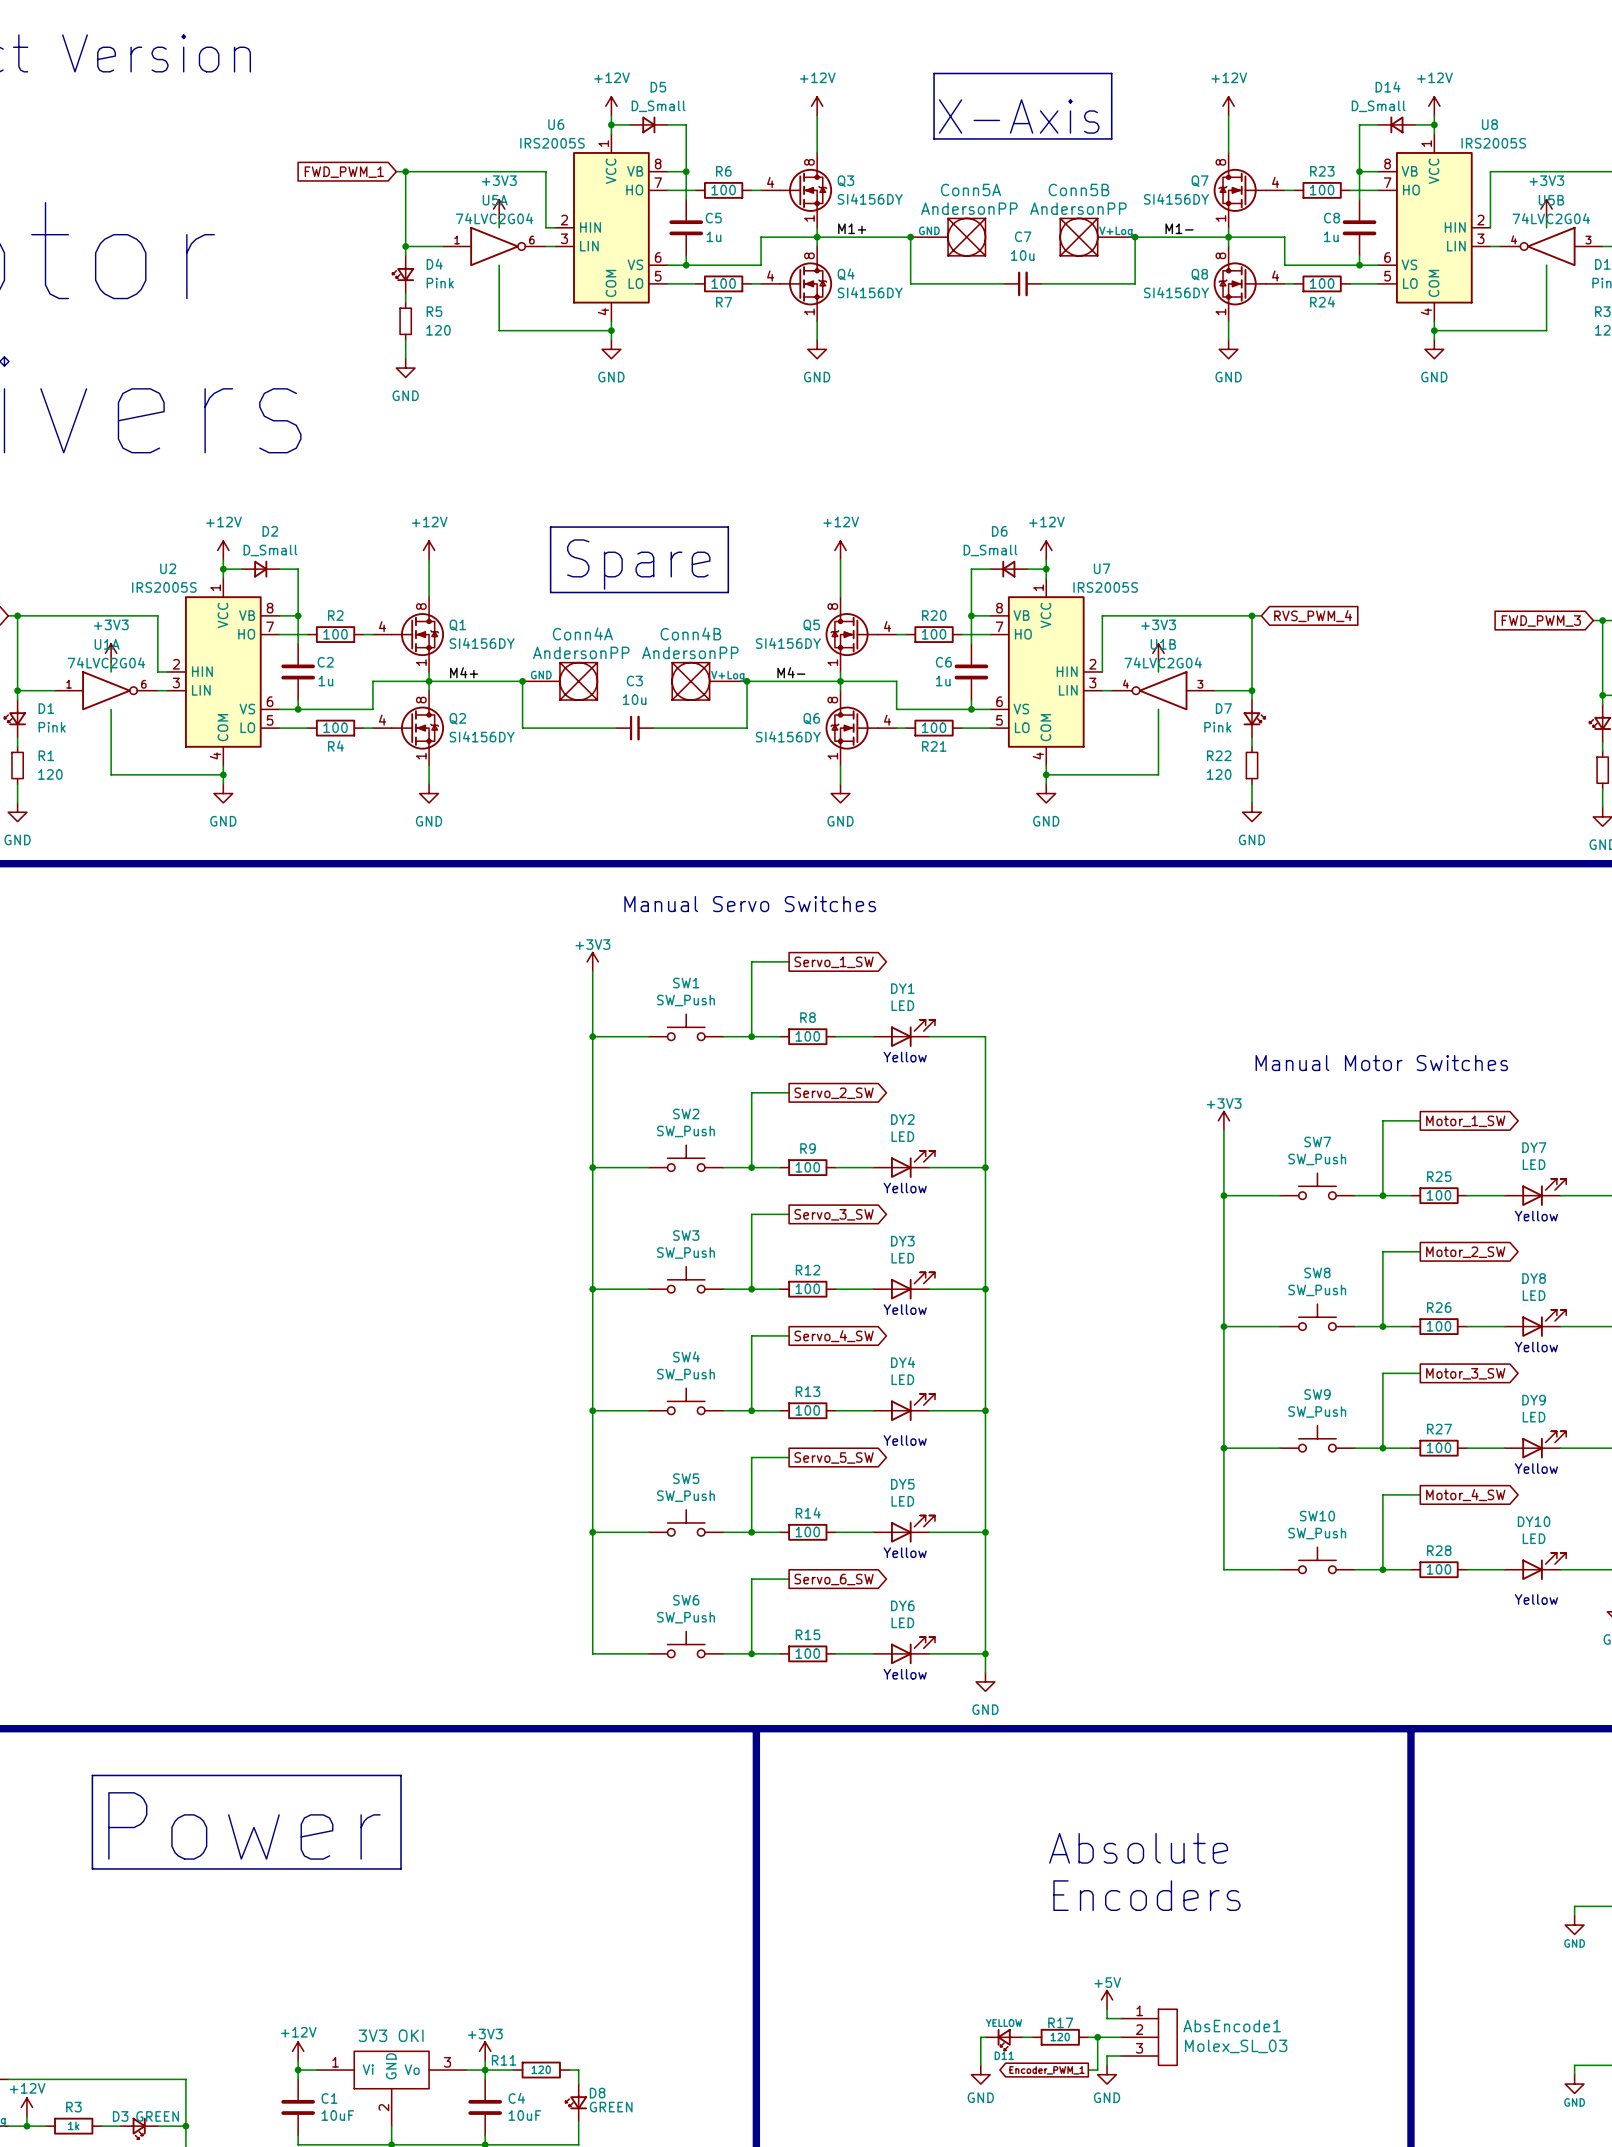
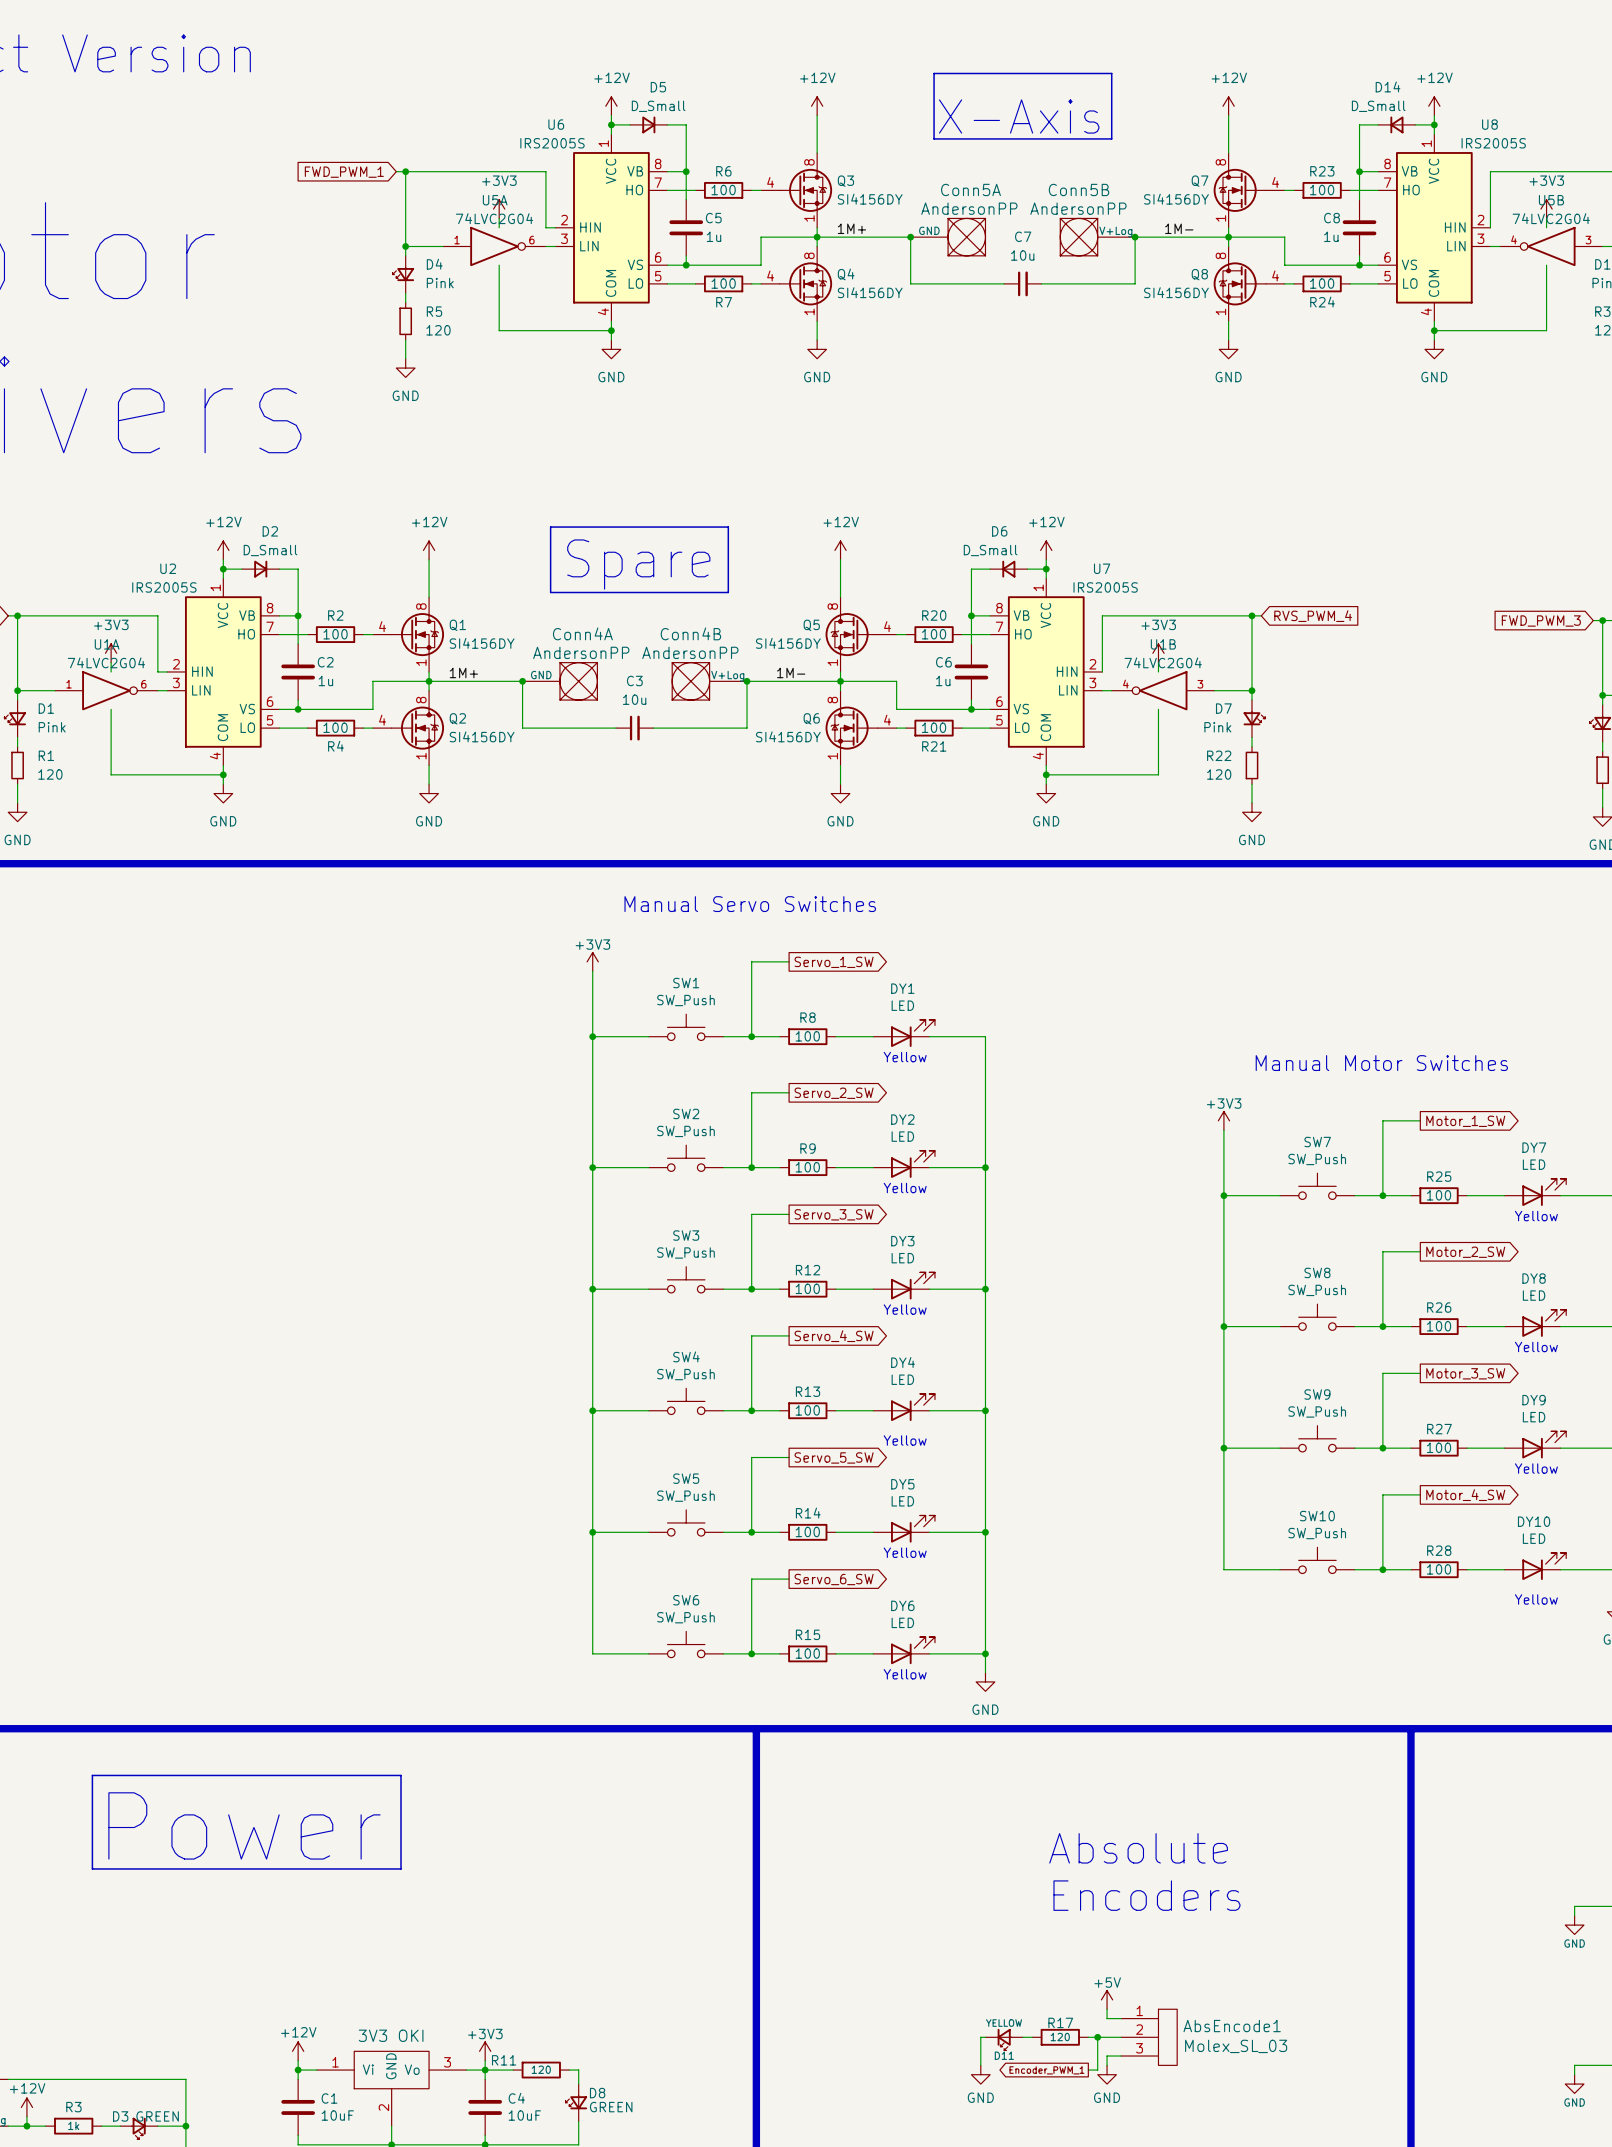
label: M1+ (852, 228) -> 1M+ (851, 228)
label: M1- (1179, 228) -> 1M- (1179, 228)
label: M4+ (464, 672) -> 1M+ (463, 672)
label: M4- (791, 672) -> 1M- (791, 672)

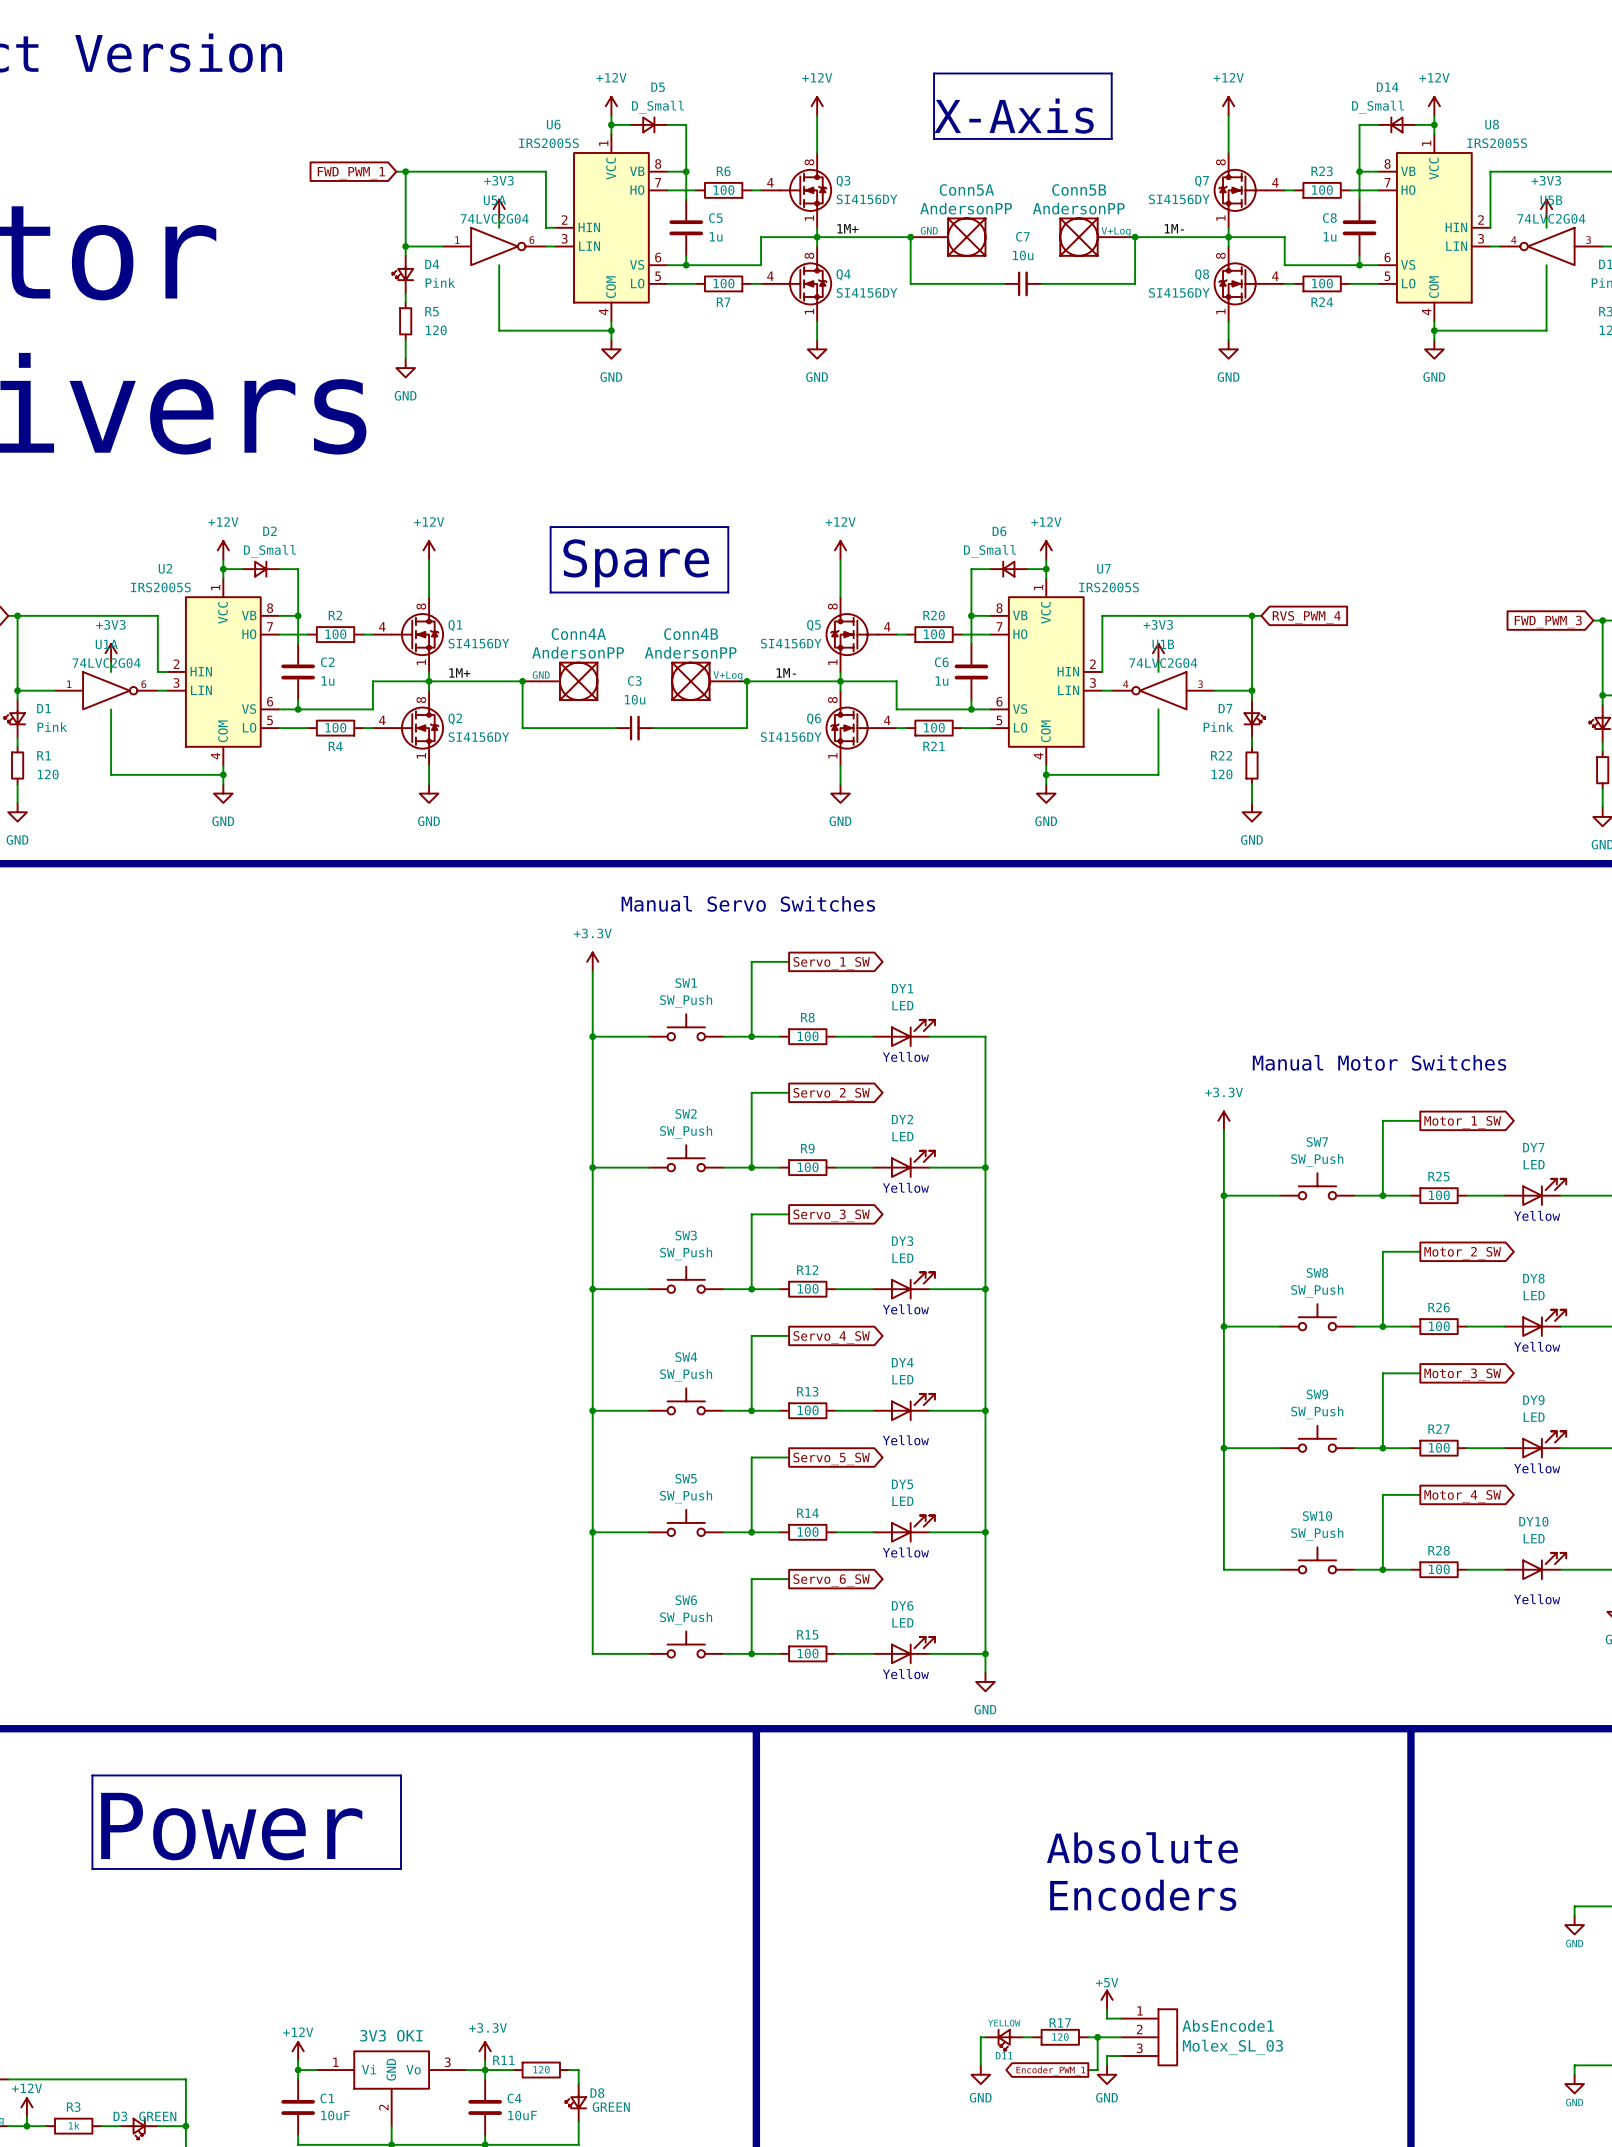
power symbol: +3V3 (592, 961) -> +3.3V (592, 961)
power symbol: +3V3 (1223, 1120) -> +3.3V (1223, 1120)
power symbol: +3V3 (485, 2051) -> +3.3V (485, 2051)

